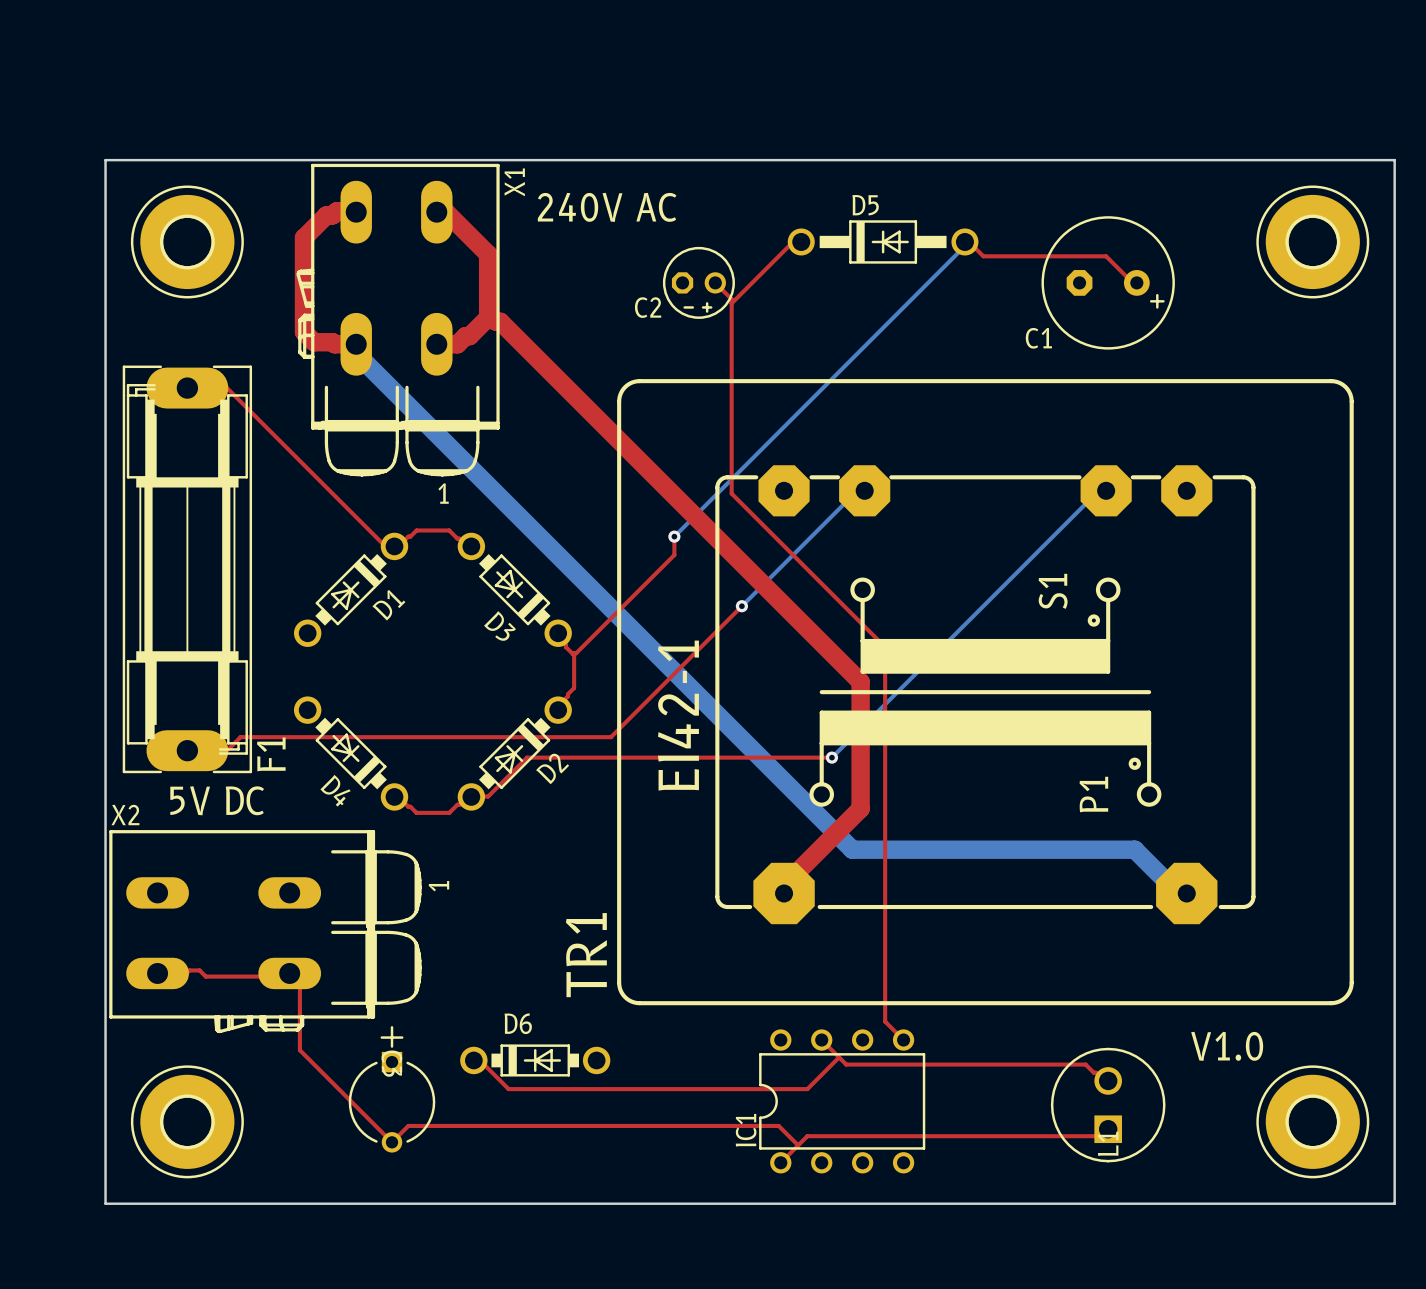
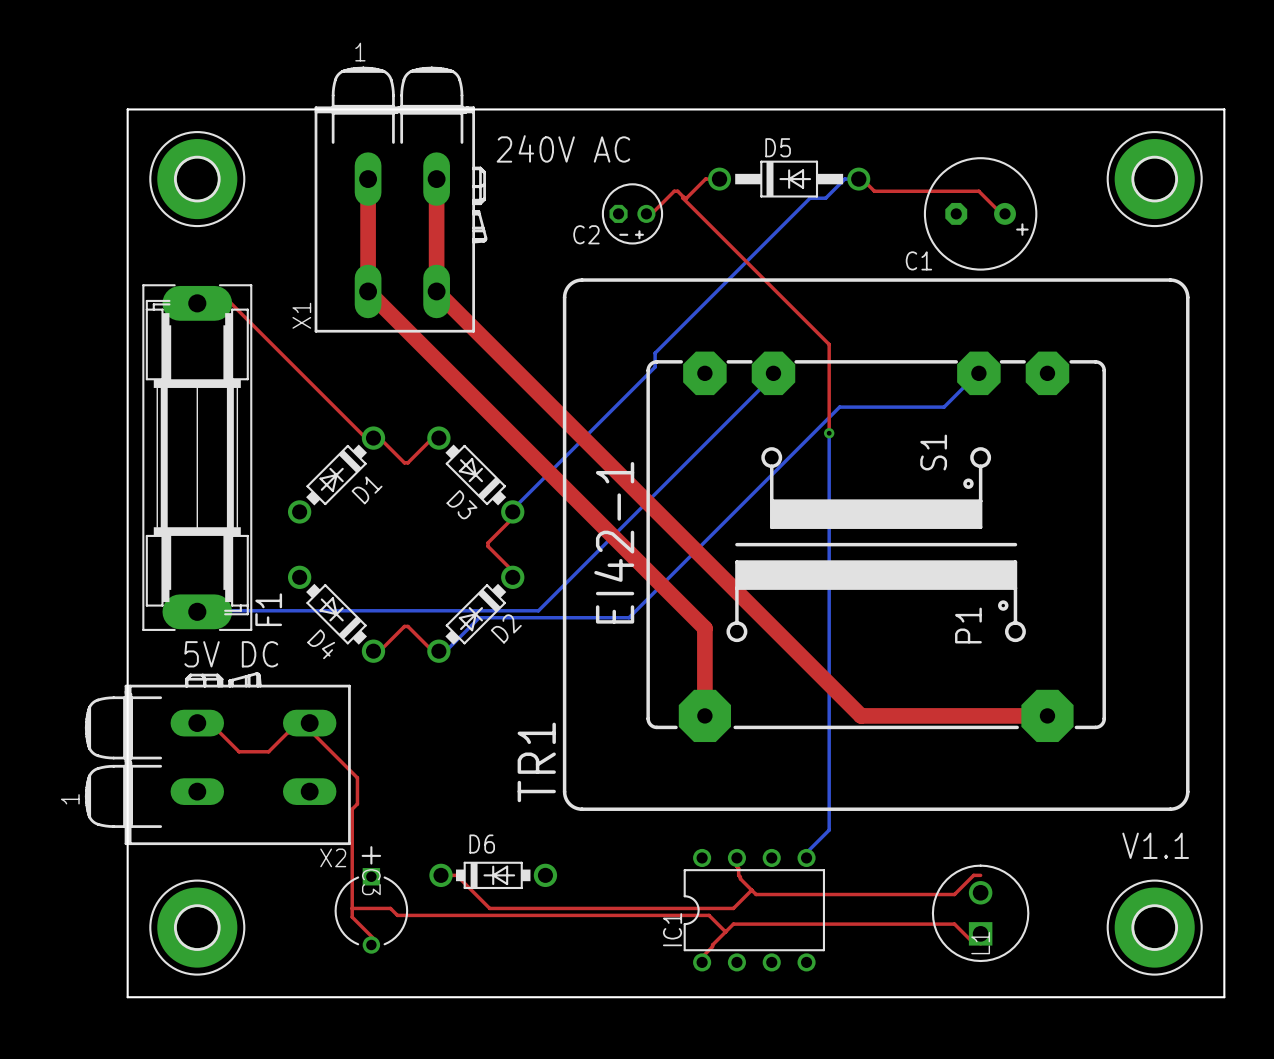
X1 footprint: [296, 163, 500, 477] -> [314, 66, 488, 333]
X1 name position: X1 (514, 182) -> X1 (301, 315)
top track: (356, 212) (336, 211) (332, 215) (326, 215) (304, 237) (304, 332) (314, 342) (356, 344) -> none
top track: (436, 212) (445, 211) (488, 254) (488, 317) -> none
top track: none -> (368, 179) (368, 291) (704, 628) (704, 715)
top track: none -> (436, 179) (436, 291) (861, 715) (1047, 715)
top track: (793, 241) (731, 303) -> (712, 179) (705, 179) (686, 198) (677, 191) (674, 191) (651, 213) (646, 213)
bottom track: (964, 241) (964, 246) (674, 536) -> (858, 179) (844, 179) (825, 198) (810, 198) (655, 353) (655, 367) (514, 508) (512, 511)
top track: none -> (683, 197) (829, 344) (829, 433)
top track: (715, 282) (731, 299) (731, 493) (885, 647) (885, 1021) (903, 1040) -> none
top track: (488, 317) (469, 336) (465, 336) (457, 344) (436, 344) -> none
top track: (488, 317) (500, 321) (860, 681) (860, 808) (784, 884) (784, 893) -> none
bottom track: (356, 344) (357, 354) (852, 849) (1134, 849) (1177, 892) (1186, 893) -> none
bottom track: none -> (773, 373) (773, 375) (538, 610) (197, 611)
bottom track: none -> (978, 373) (944, 407) (839, 407) (629, 617) (479, 617) (446, 650) (438, 651)
bottom track: (864, 490) (856, 491) (741, 606) -> none
bottom track: (1106, 490) (1097, 491) (831, 757) -> none
top track: (674, 536) (674, 555) (573, 654) -> none
via: (674, 536) -> none
bottom track: none -> (829, 433) (829, 830) (806, 852) (806, 857)
via: none -> (829, 433)
top track: (394, 546) (400, 544) (416, 530) (449, 530) (465, 544) (471, 546) -> (373, 438) (380, 438) (404, 462) (407, 462) (432, 438) (438, 438)
top track: (741, 606) (610, 737) (240, 737) (228, 749) (187, 750) -> none
via: (741, 606) -> none
top track: (558, 633) (559, 638) (574, 655) (574, 688) (559, 704) (558, 710) -> (512, 511) (512, 518) (488, 542) (488, 546) (512, 570) (512, 577)
TR1 position: (985, 692) -> (876, 544)
top track: (831, 757) (527, 757) (488, 796) (465, 798) (449, 812) (416, 812) (400, 798) (394, 796) -> (438, 651) (432, 650) (407, 626) (404, 626) (380, 650) (373, 651)
via: (831, 757) -> none
X2 name position: X2 (125, 815) -> X2 (333, 857)
X2 footprint: [109, 830, 422, 1034] -> [84, 672, 351, 846]
top track: none -> (197, 723) (211, 723) (239, 751) (268, 751) (287, 732) (310, 732) (309, 723) (310, 730) (357, 777) (357, 804) (352, 809) (352, 917) (374, 939) (374, 945)
top track: (157, 973) (199, 970) (205, 976) (289, 976) (289, 973) -> none
top track: (289, 974) (299, 984) (299, 1050) (392, 1142) (408, 1125) (778, 1125) (798, 1145) -> none
top track: (821, 1040) (846, 1064) (1085, 1064) (1104, 1080) (1108, 1080) -> (736, 857) (740, 878) (756, 894) (954, 894) (973, 875) (980, 875)
text: V1.0 (1227, 1046) -> V1.1 (1155, 845)
top track: (839, 1057) (807, 1089) (508, 1089) (479, 1060) -> (751, 890) (733, 908) (489, 908) (456, 875) (446, 875)
top track: none -> (352, 908) (390, 908) (397, 915) (709, 915) (725, 931)
top track: (1108, 1129) (1102, 1136) (807, 1136) (780, 1162) -> (980, 943) (973, 943) (954, 924) (733, 924) (702, 957) (702, 962)

